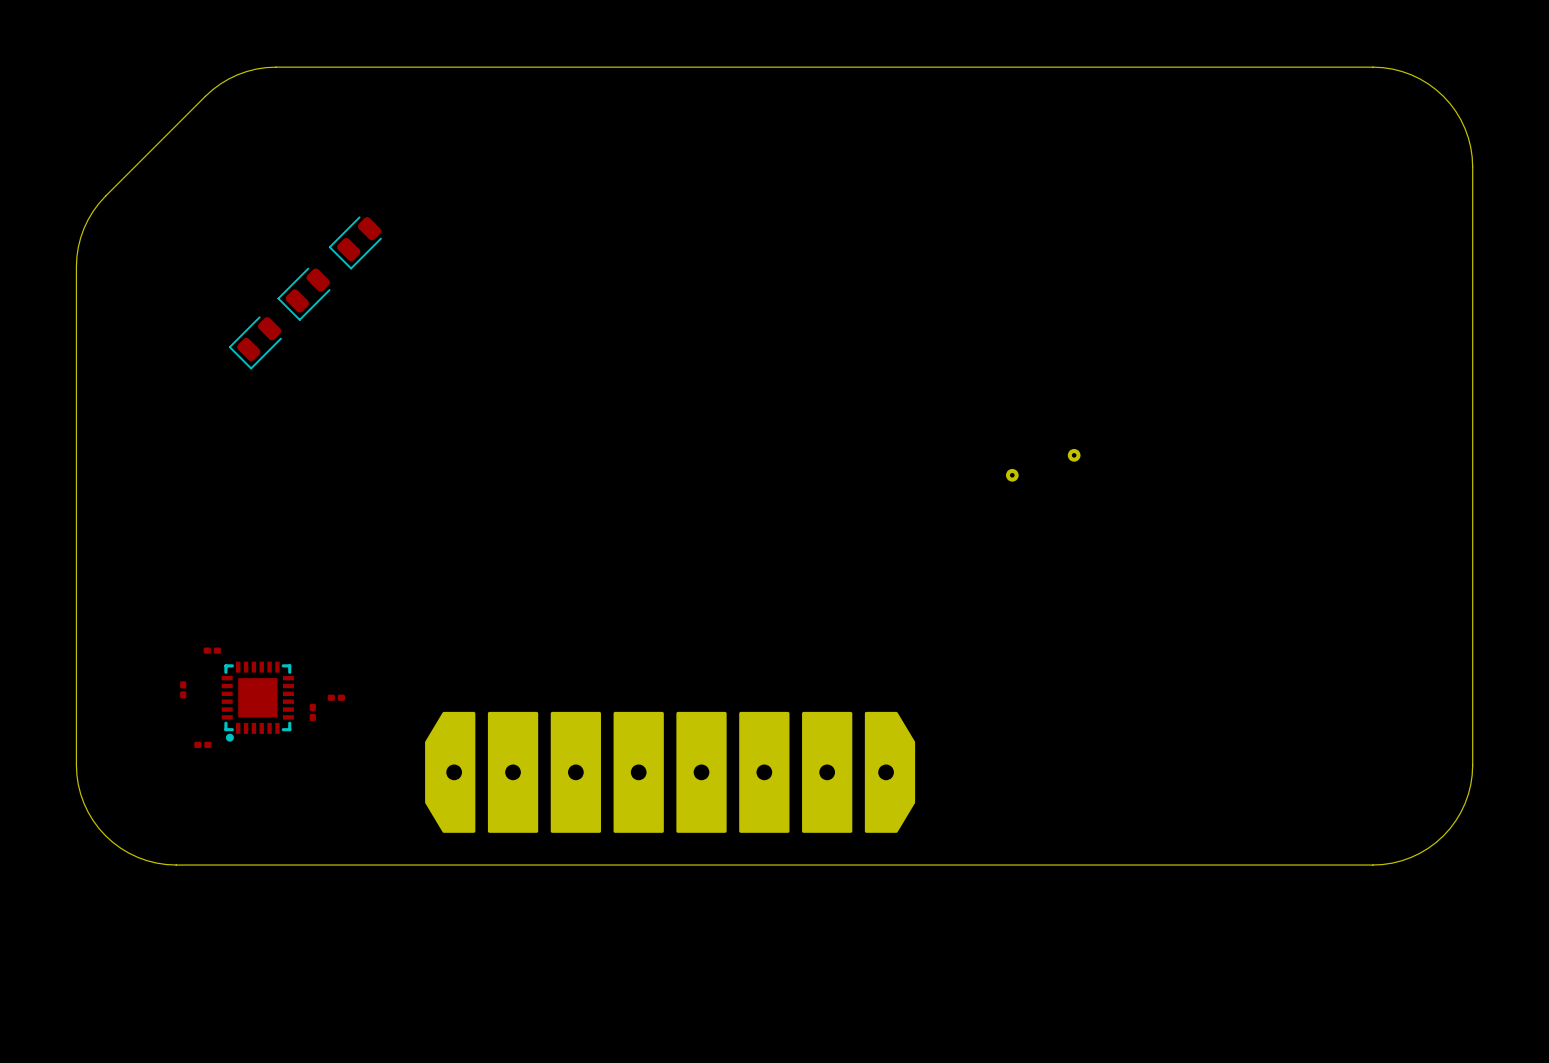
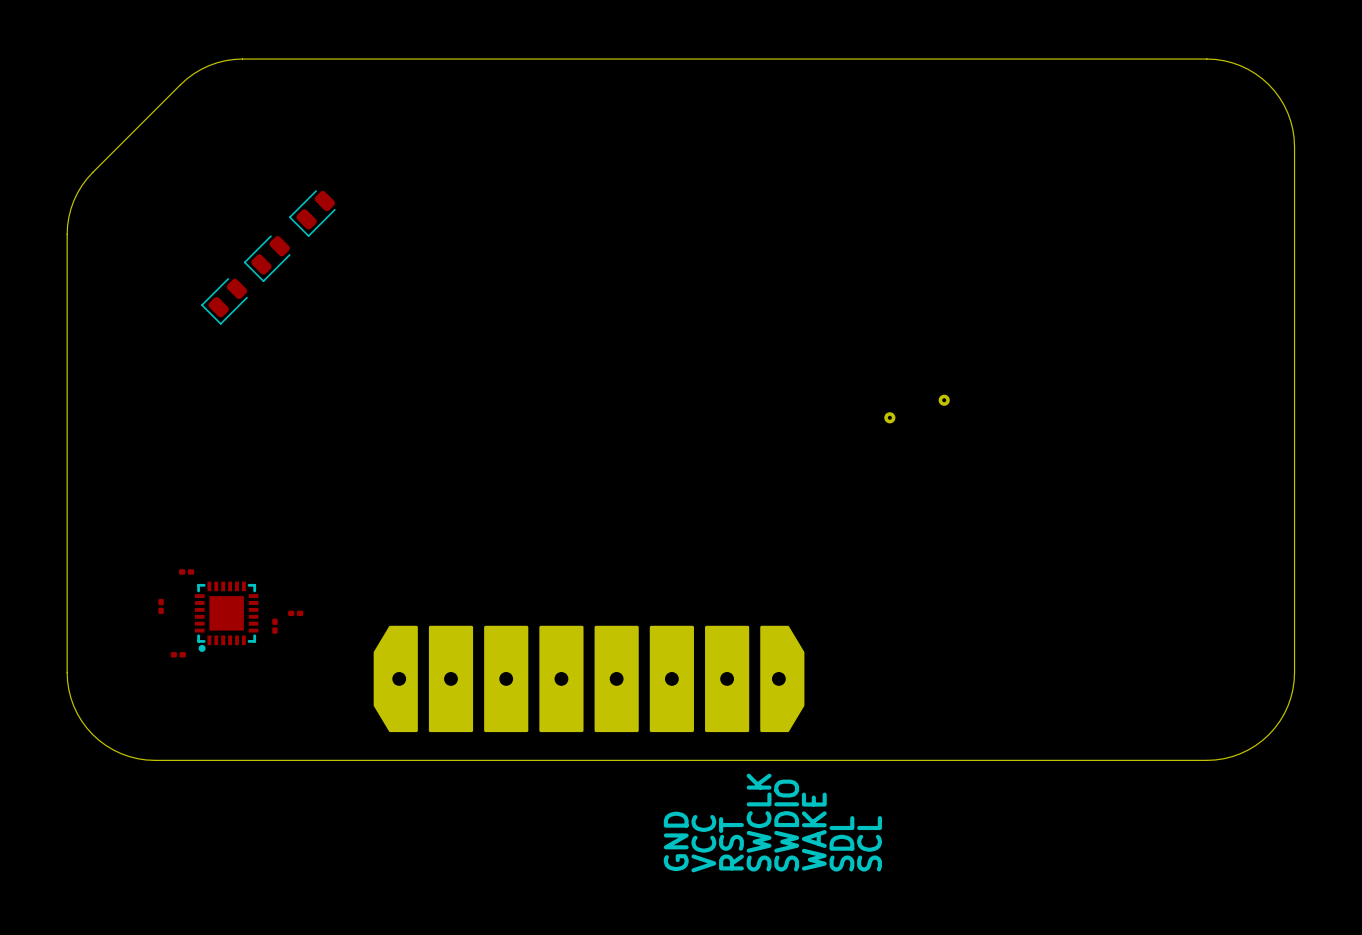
text: none -> SWCLK (759, 822)
text: none -> SWDIO (786, 825)
text: none -> WAKE (814, 831)
text: none -> GND (676, 841)
text: none -> VCC (703, 843)
text: none -> RST (731, 843)
text: none -> SDL (841, 843)
text: none -> SCL (869, 843)

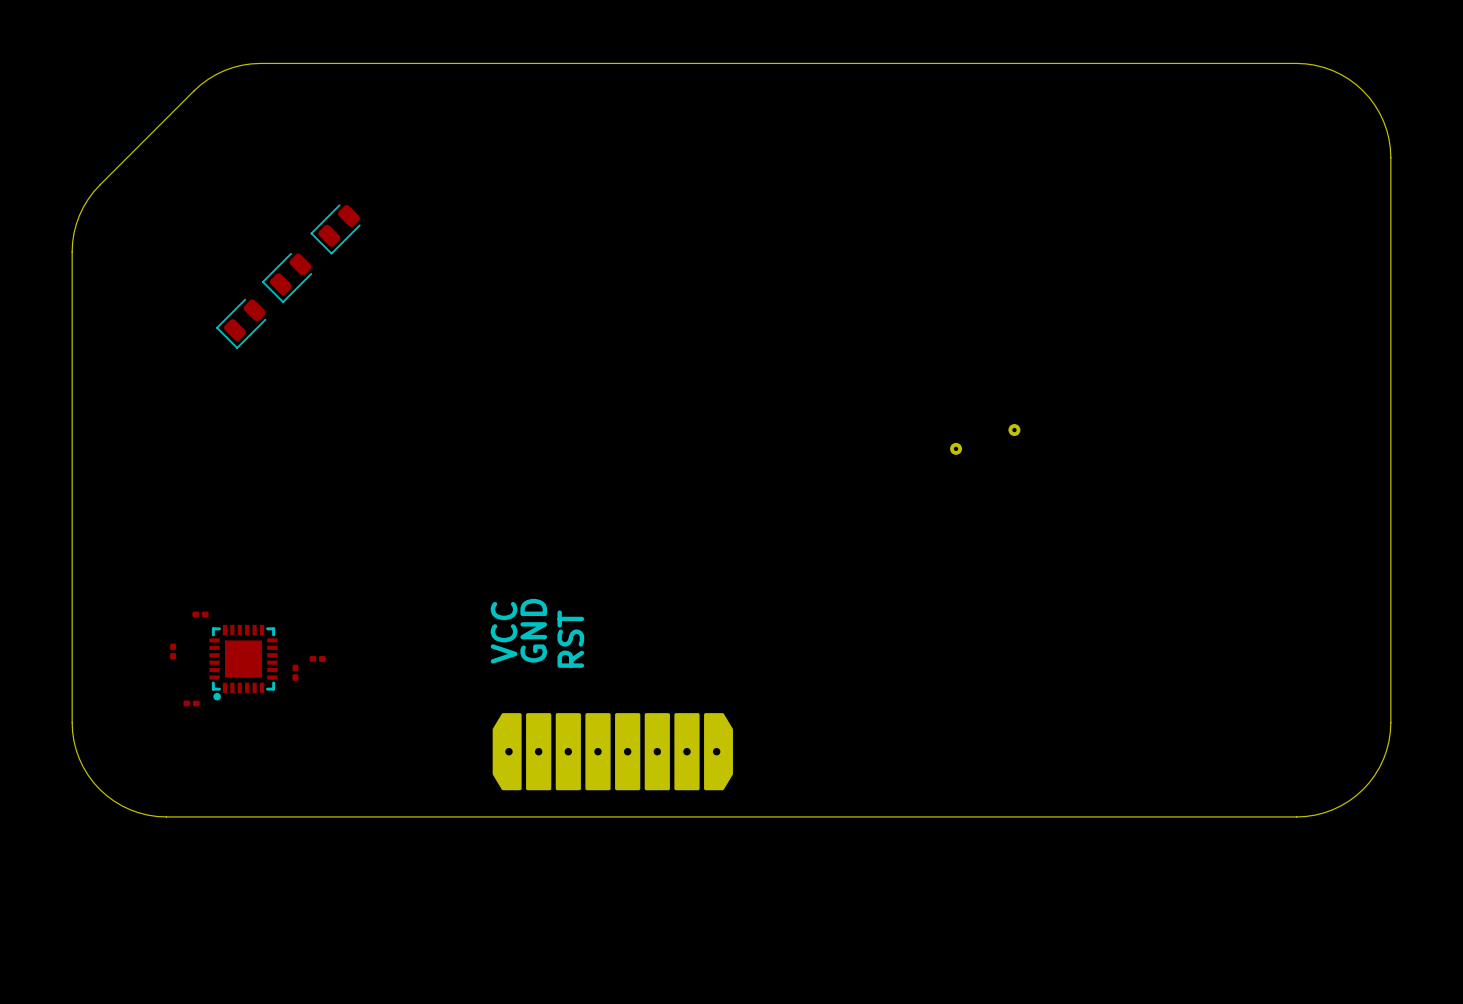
text: none -> VCC (504, 632)
part: (589, 678) -> none
part: none -> (612, 751)
text: SWCLK (759, 822) -> none
text: SWDIO (786, 825) -> none
text: WAKE (814, 831) -> none
text position: GND (676, 841) -> GND (533, 630)
text: VCC (703, 843) -> none
text position: RST (731, 843) -> RST (570, 639)
text: SDL (841, 843) -> none
text: SCL (869, 843) -> none

